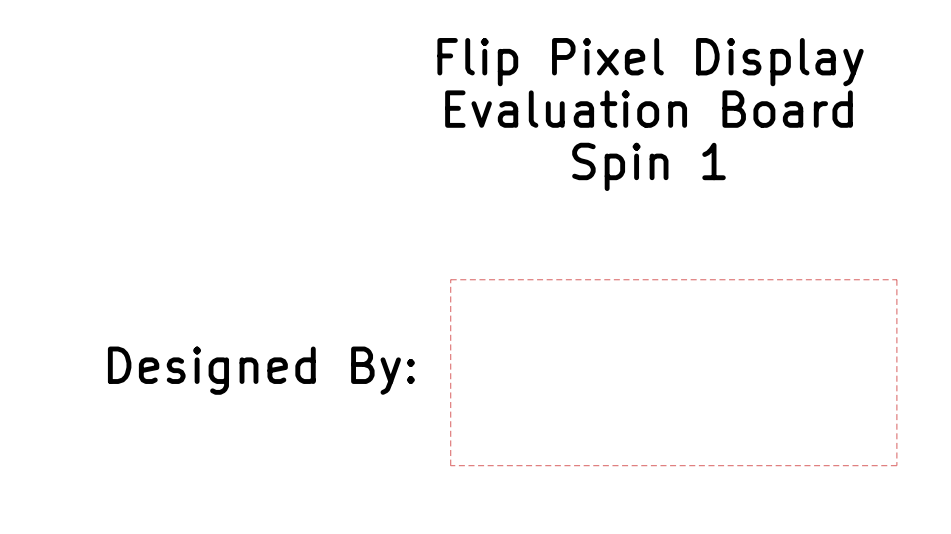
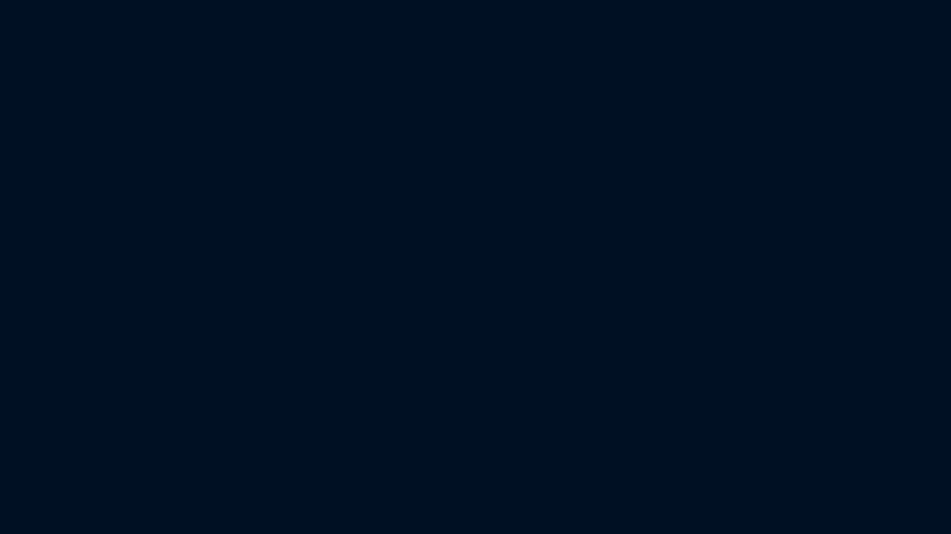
text: Flip Pixel Display (650, 62) -> none
text: Evaluation Board (648, 109) -> none
text: Spin 1 (648, 166) -> none
top zone outline: (450, 279) (450, 465) (896, 465) (896, 279) (450, 279) -> none
text: Designed By: (261, 370) -> none

